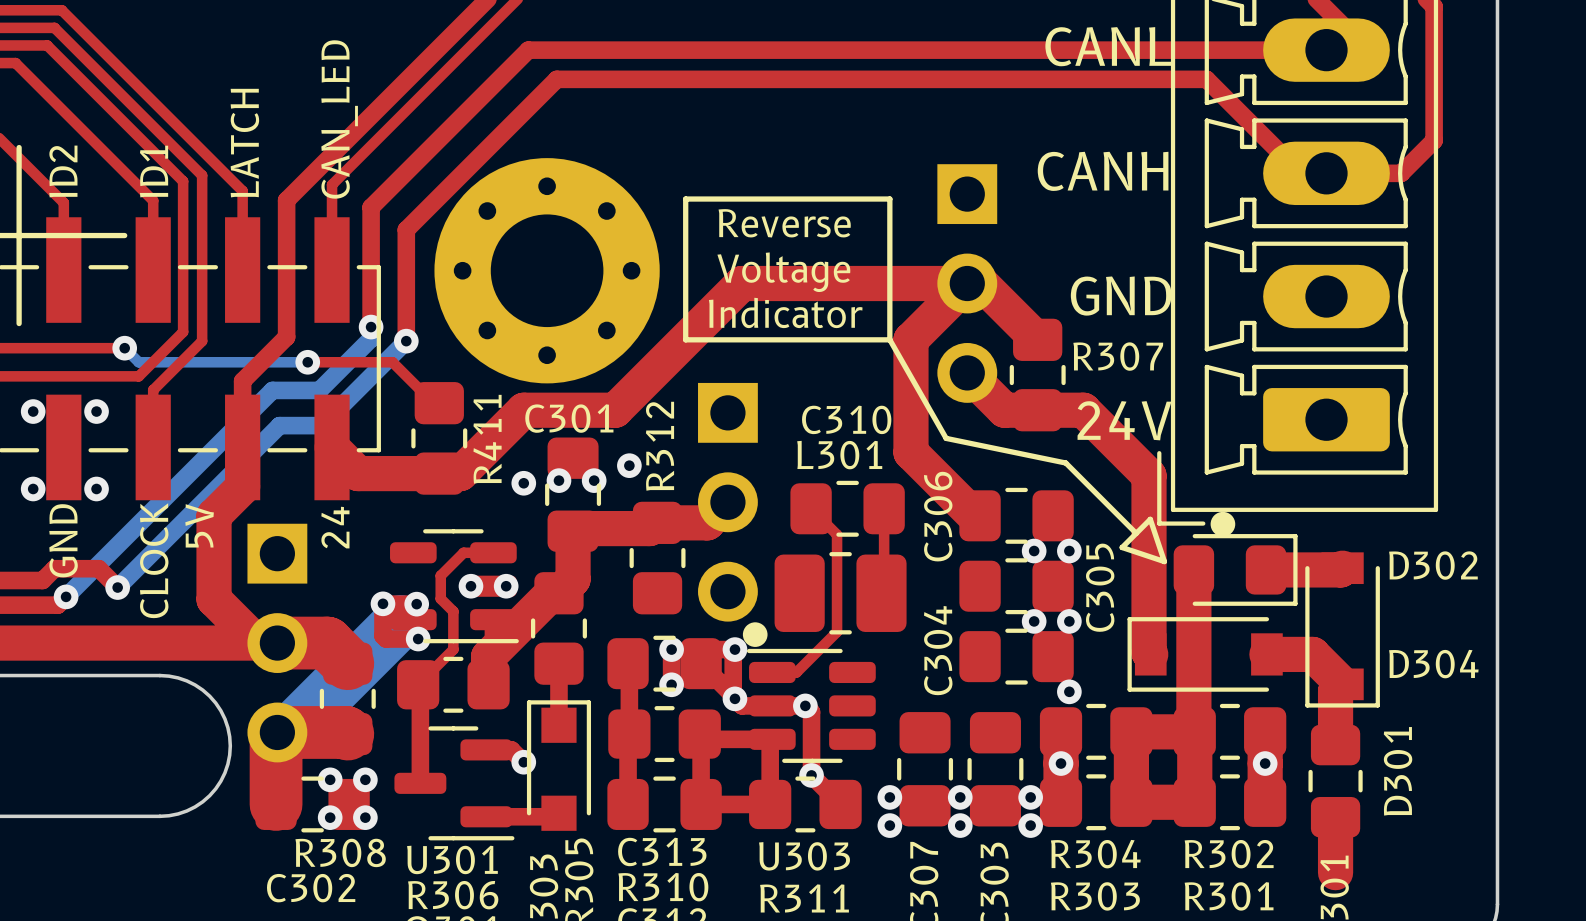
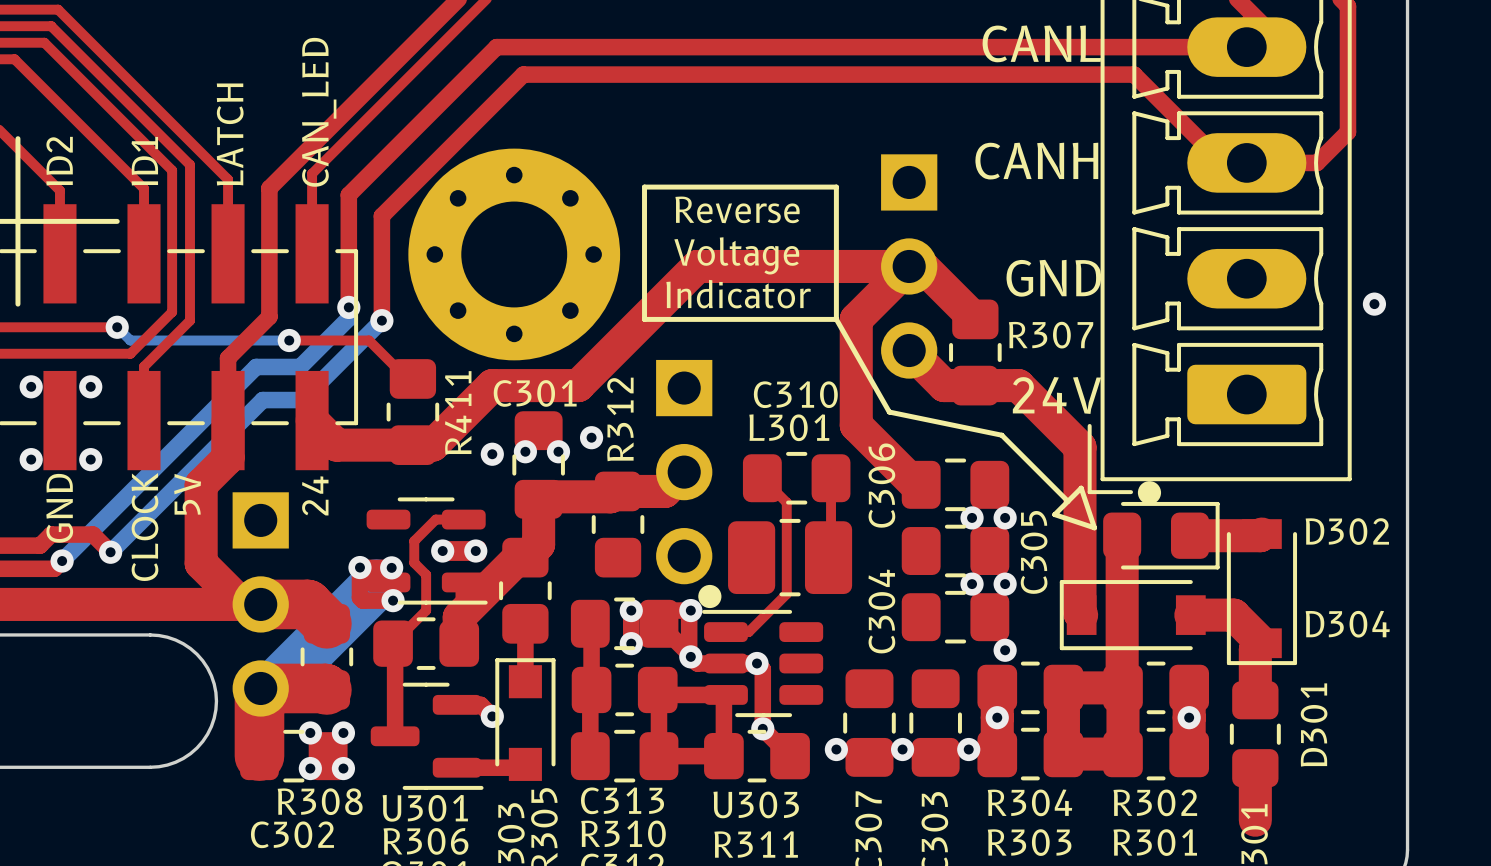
via: none -> (1374, 304)
via: (889, 825) -> none
via: (960, 825) -> none
via: (1030, 825) -> none

